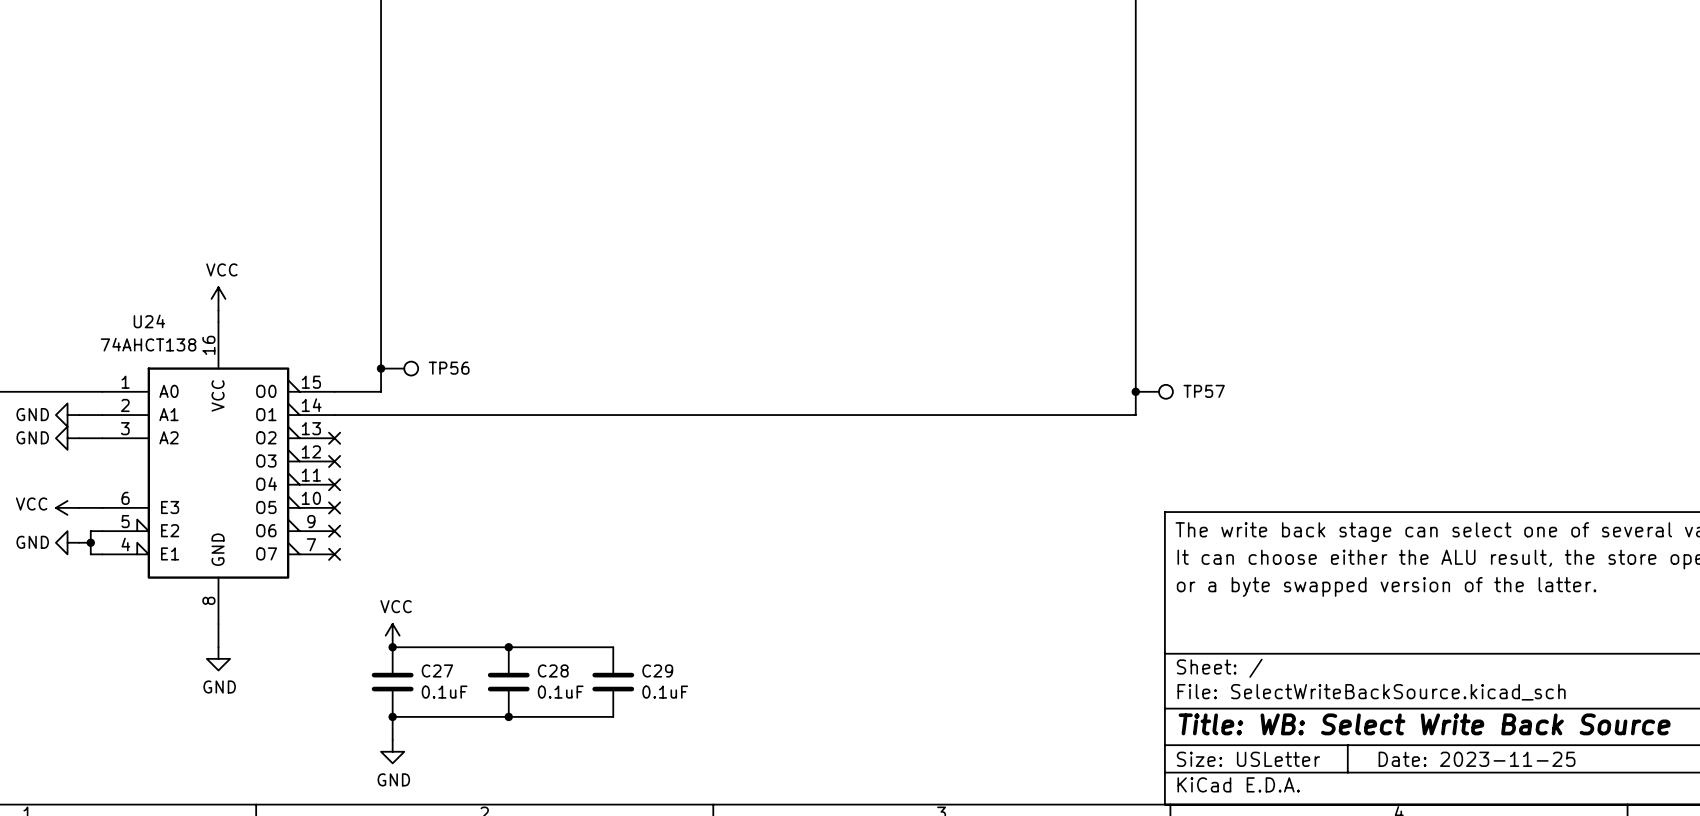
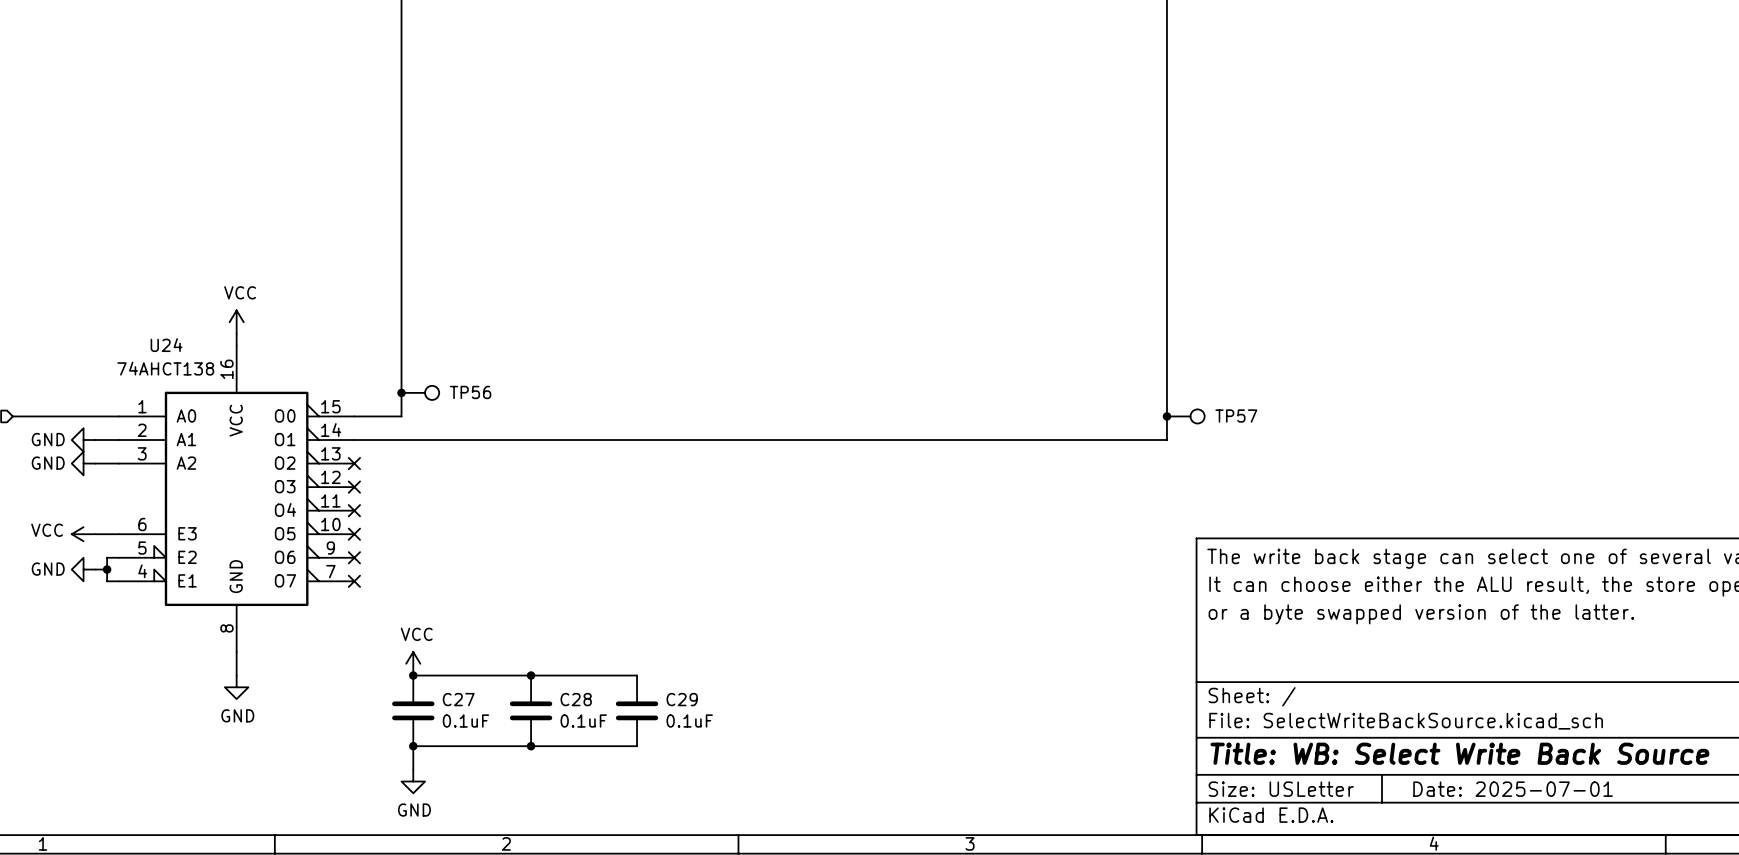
title block: Date: 2023-11-25 (1477, 759) -> Date: 2025-07-01 (1513, 789)

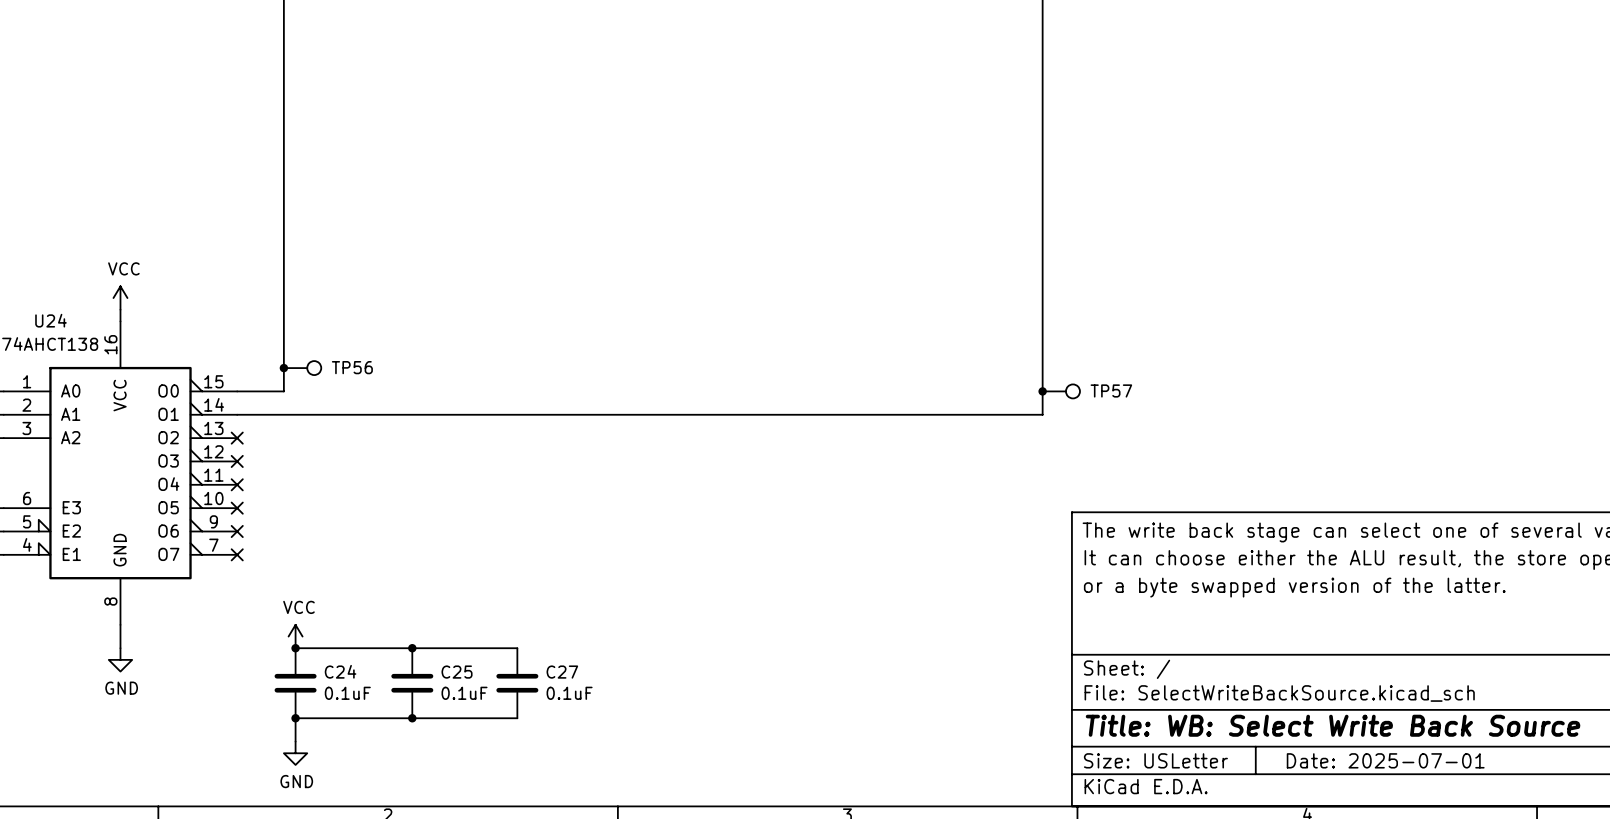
C27 name: C27 (458, 699) -> C24 (340, 671)
C28 name: C28 (576, 699) -> C25 (457, 672)
C29 name: C29 (682, 699) -> C27 (562, 672)

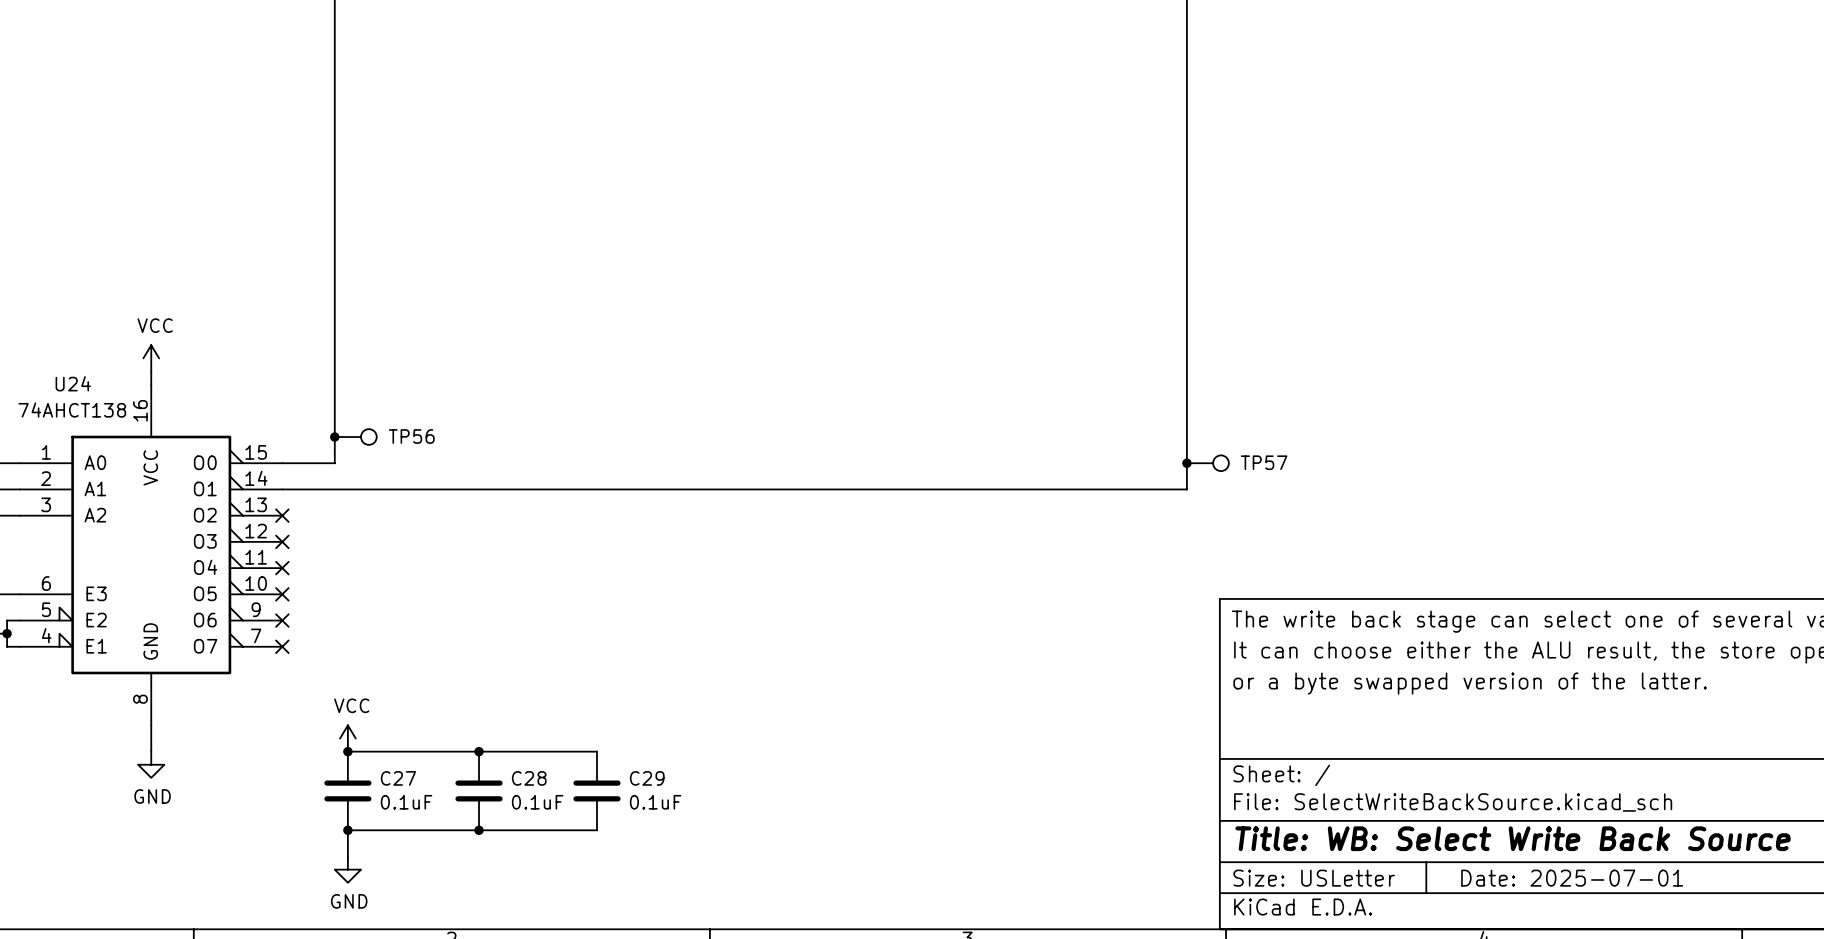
C24 name: C24 (340, 671) -> C27 (398, 778)
C25 name: C25 (457, 672) -> C28 (529, 778)
C27 name: C27 (562, 672) -> C29 (647, 778)

